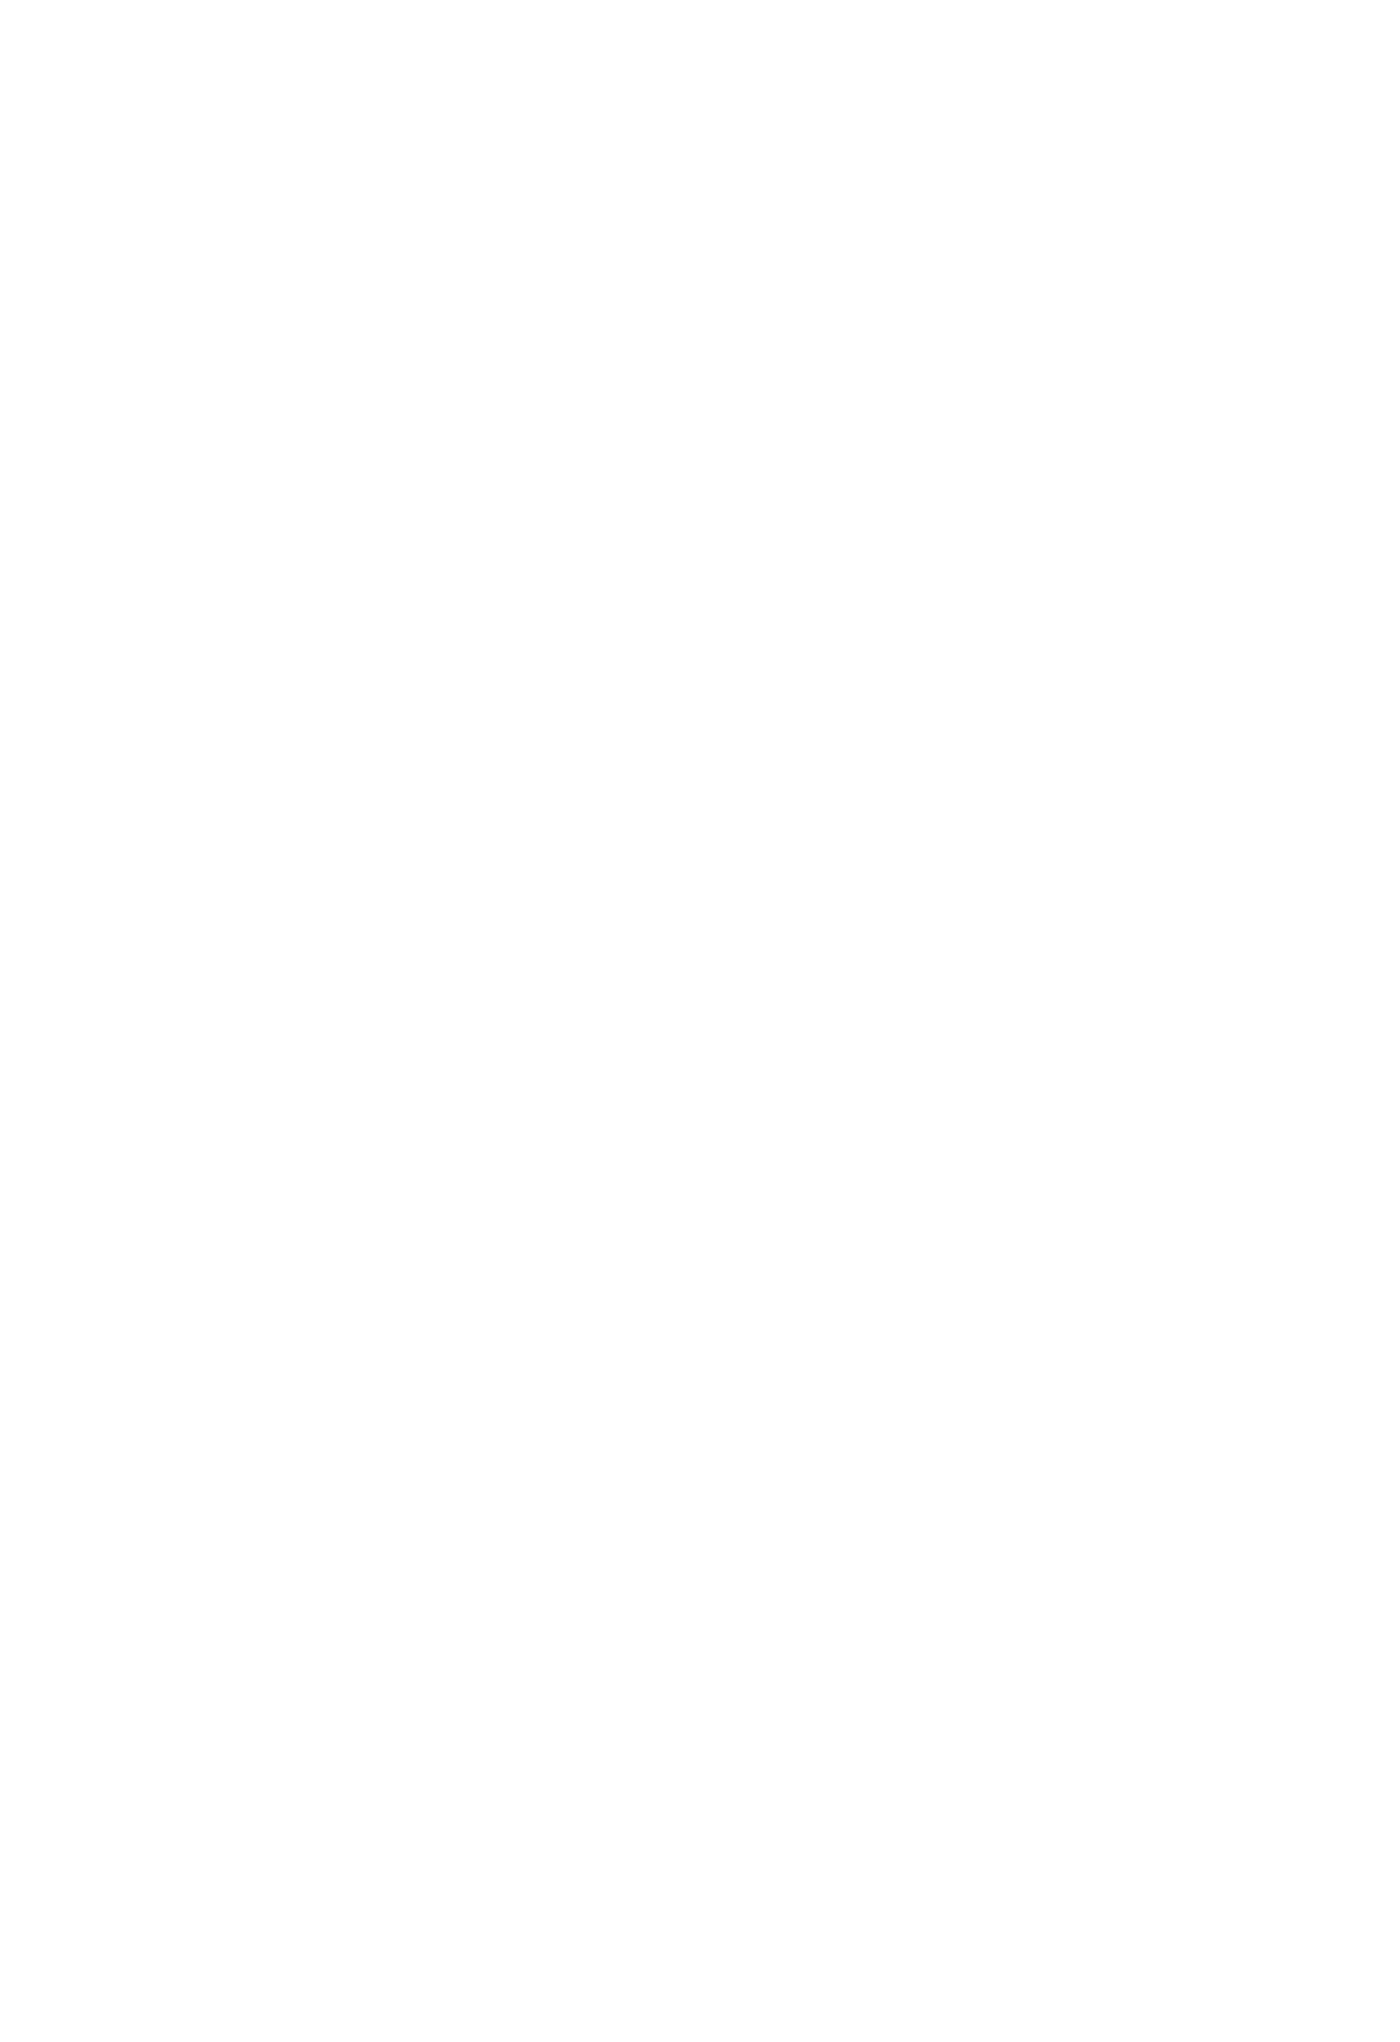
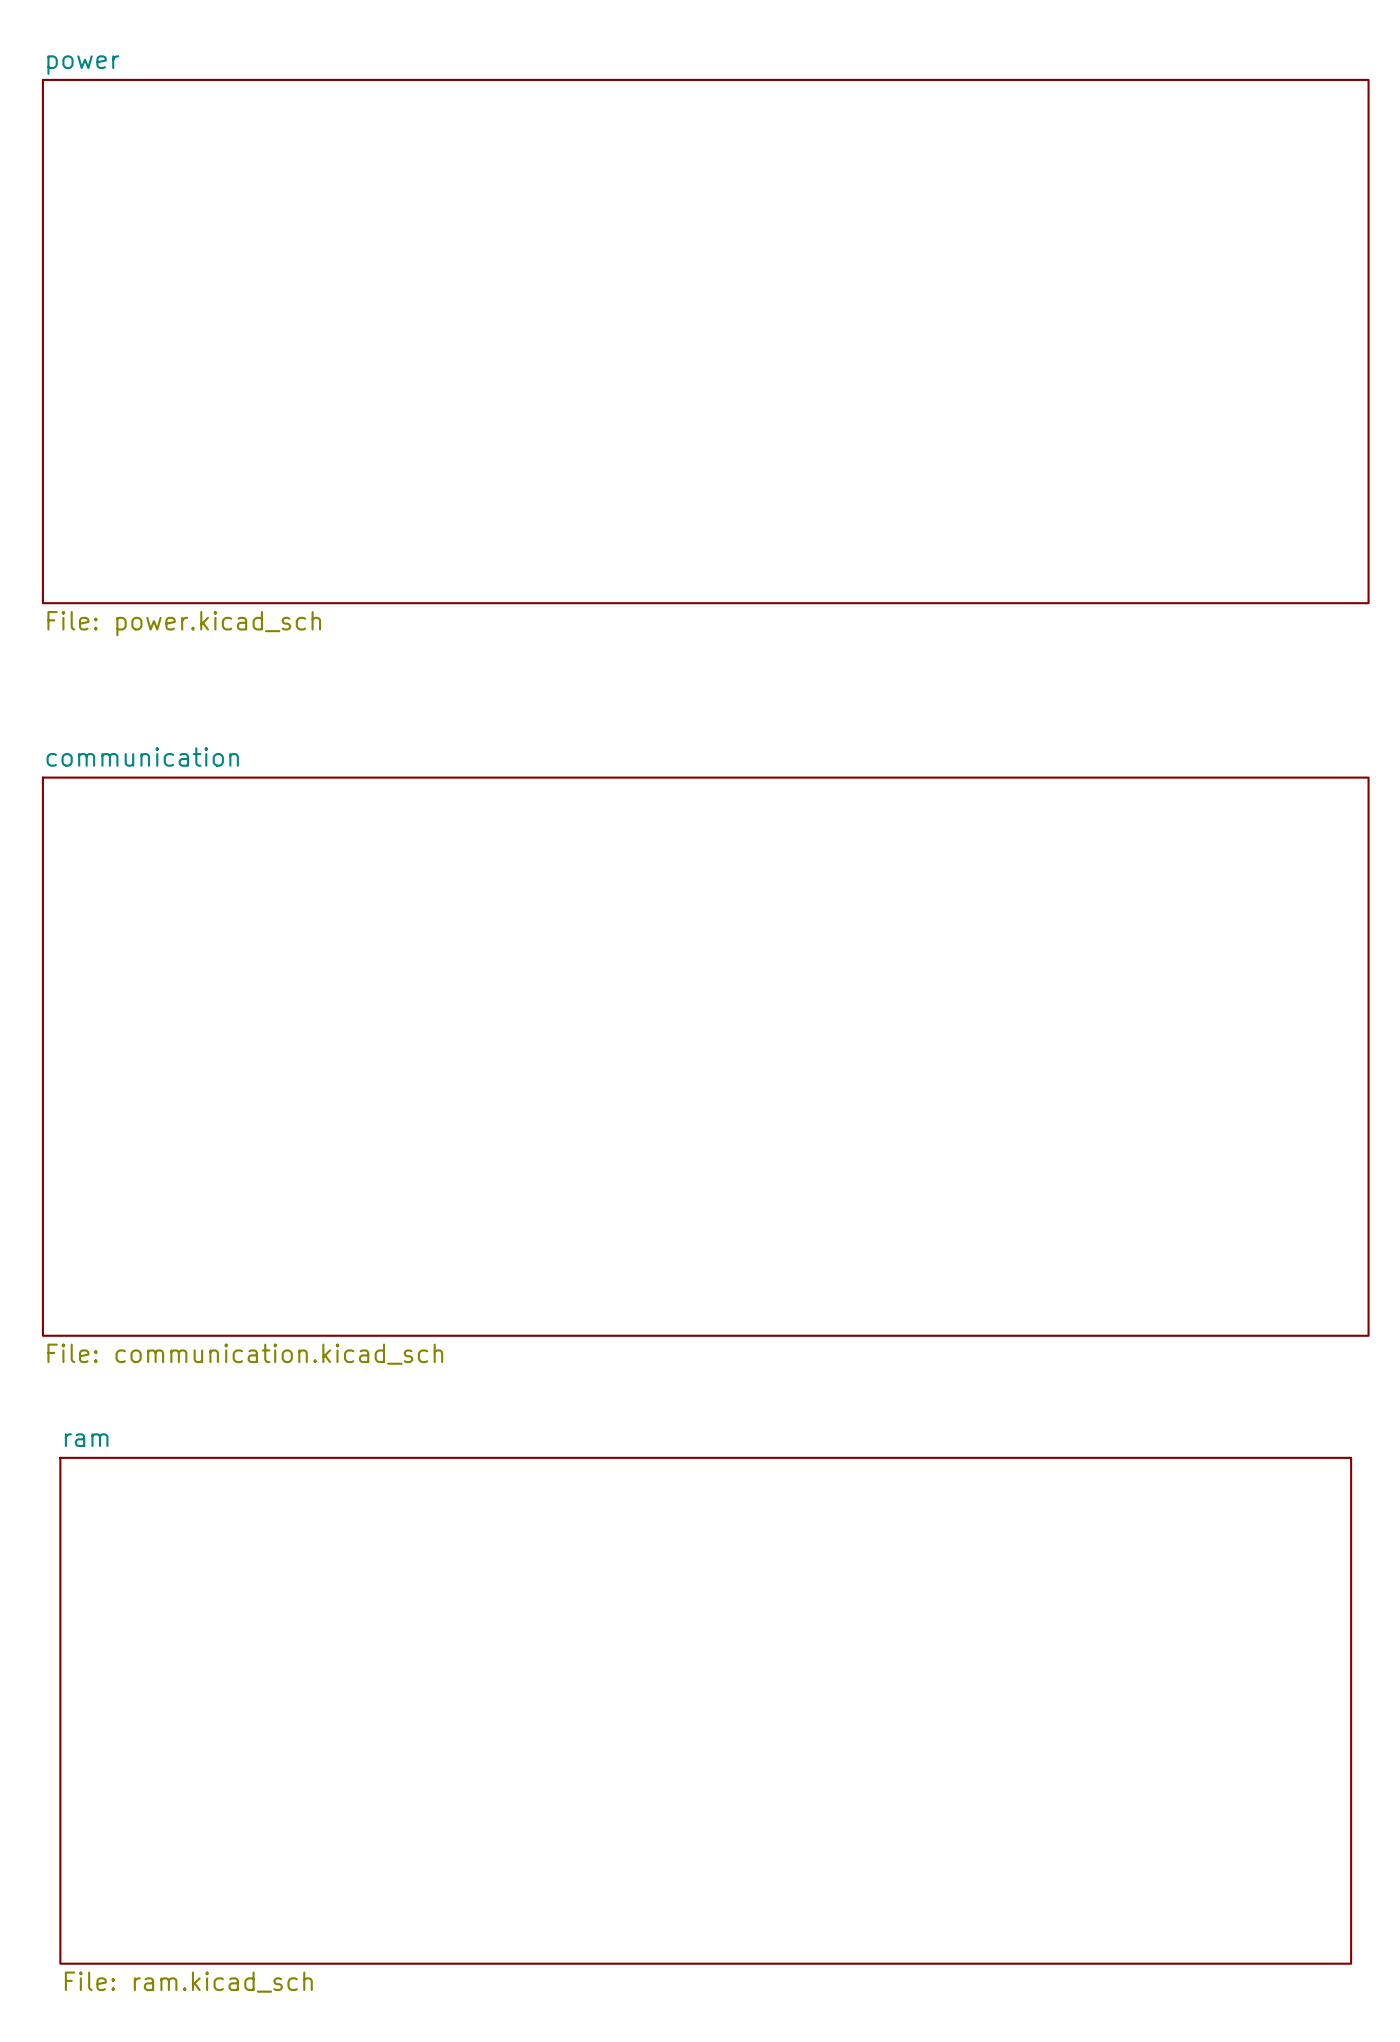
sheet power: none -> File: power.kicad_sch (705, 341)
sheet communication: none -> File: communication.kicad_sch (705, 1056)
sheet ram: none -> File: ram.kicad_sch (705, 1710)

